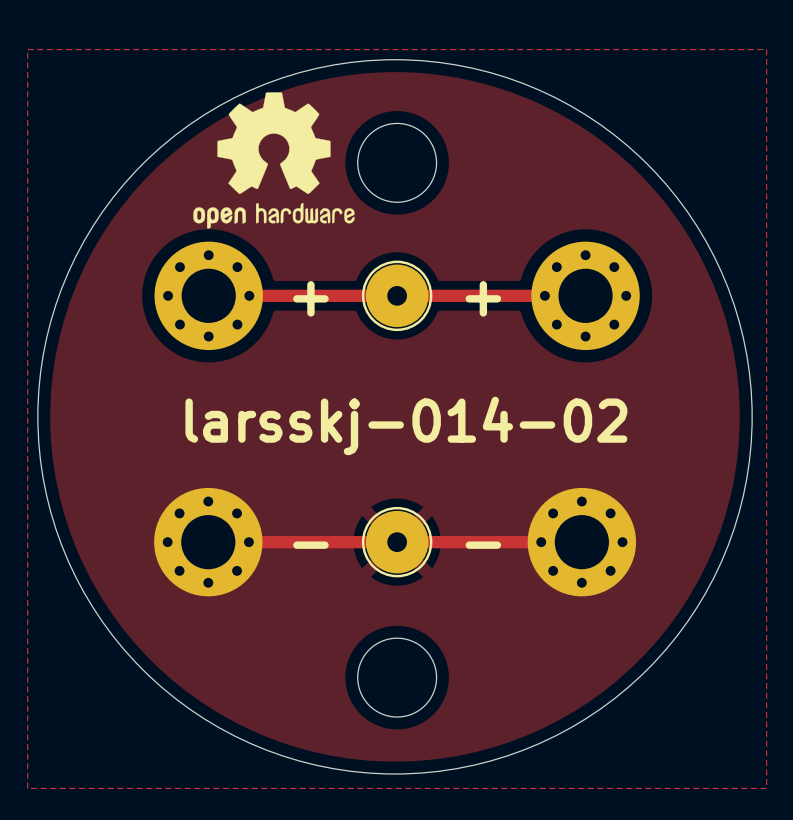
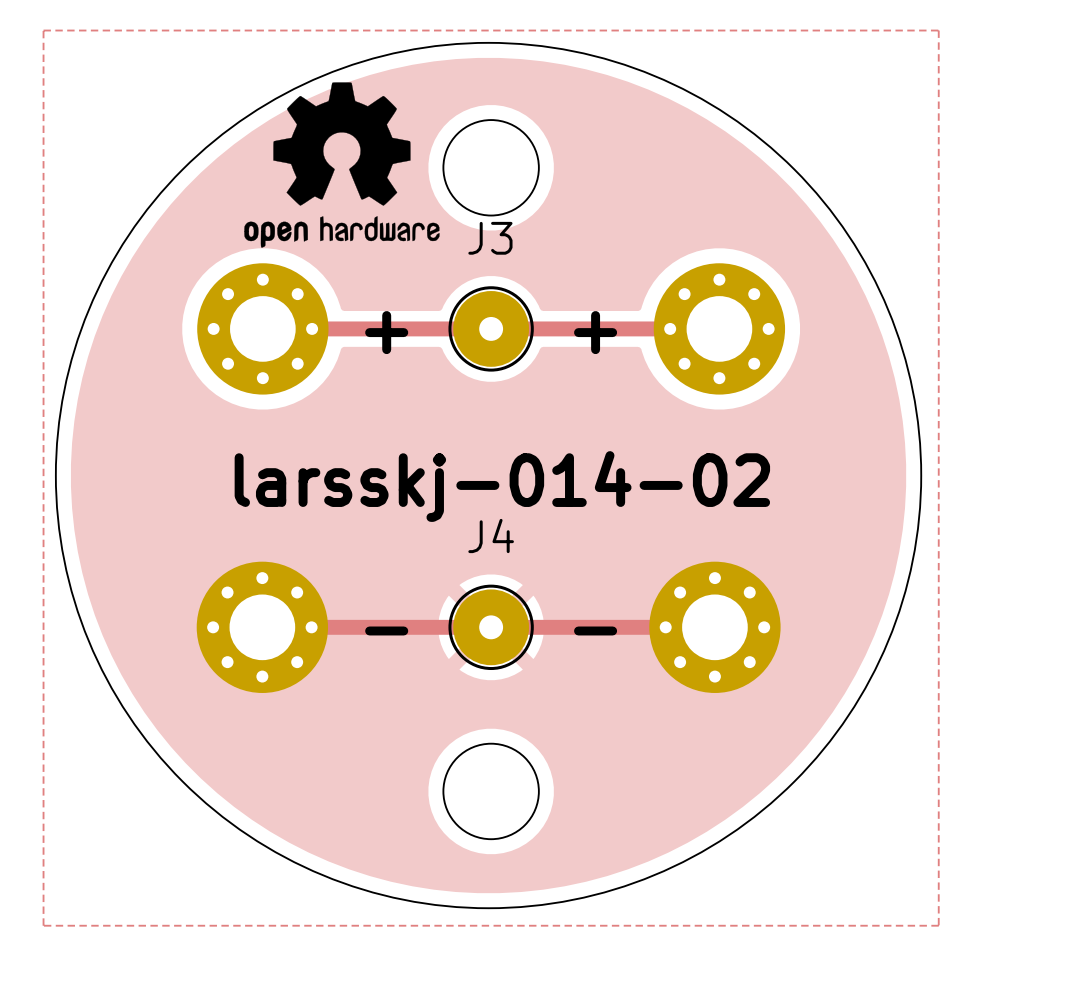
J3 name: none -> J3 (490, 238)
J4 name: none -> J4 (491, 535)

